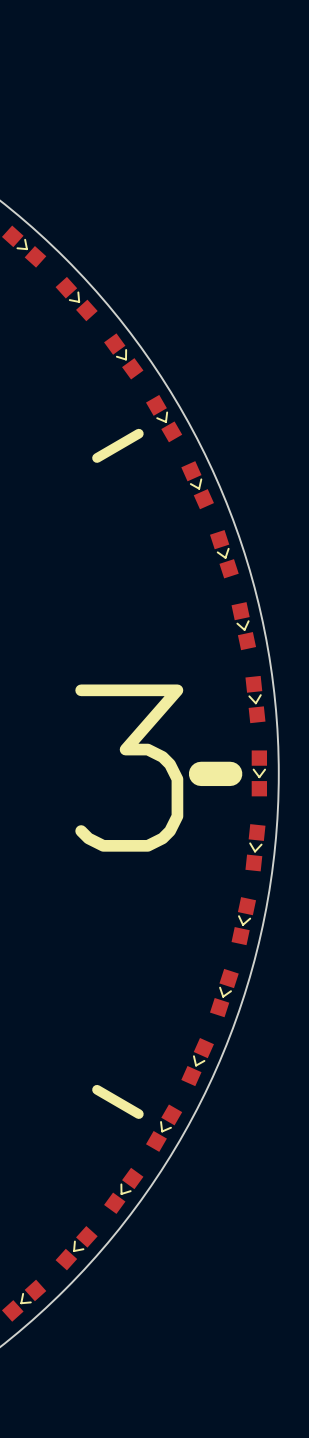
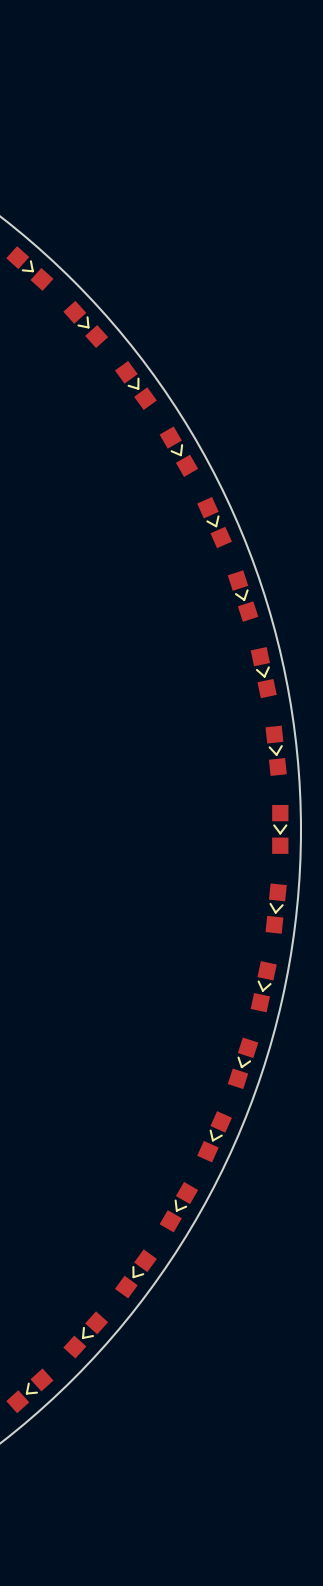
line: (138, 433) (97, 458) -> none
text: 3 (129, 768) -> none
line: (201, 773) (230, 773) -> none
line: (97, 1089) (138, 1114) -> none

